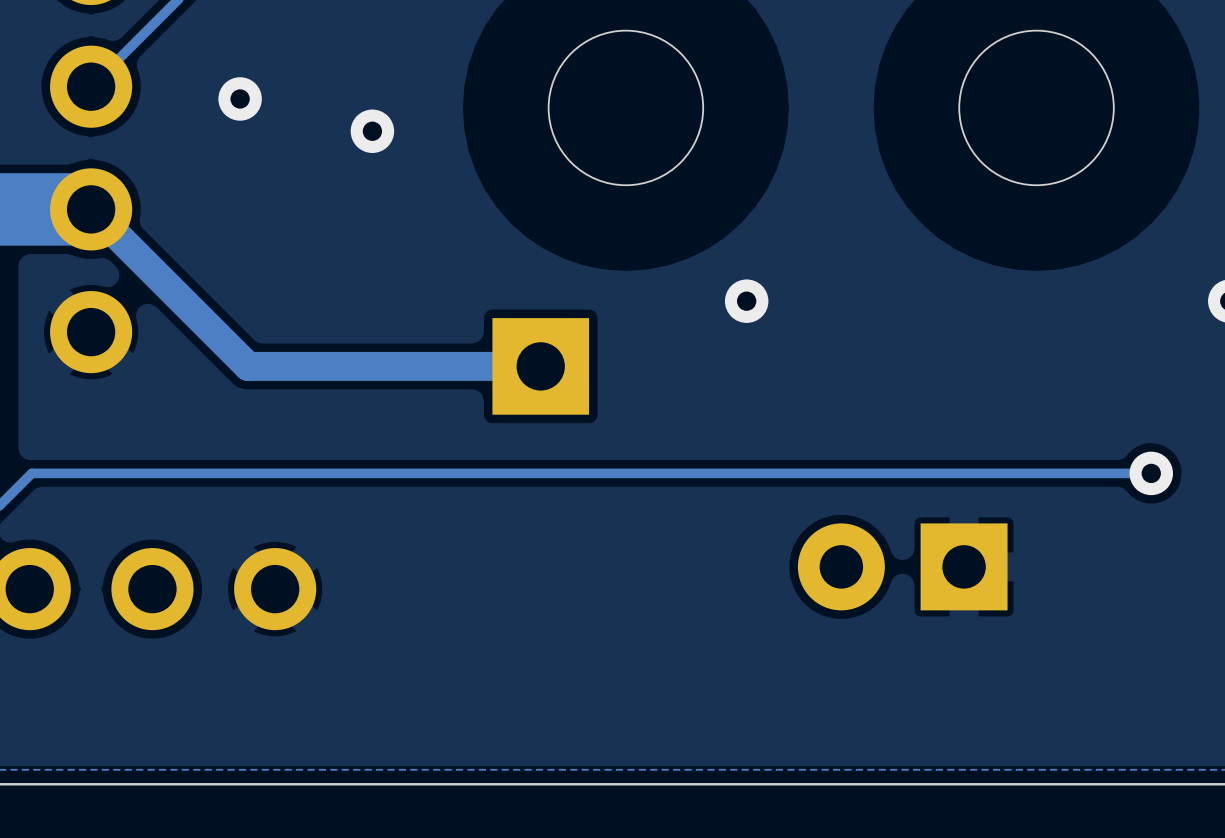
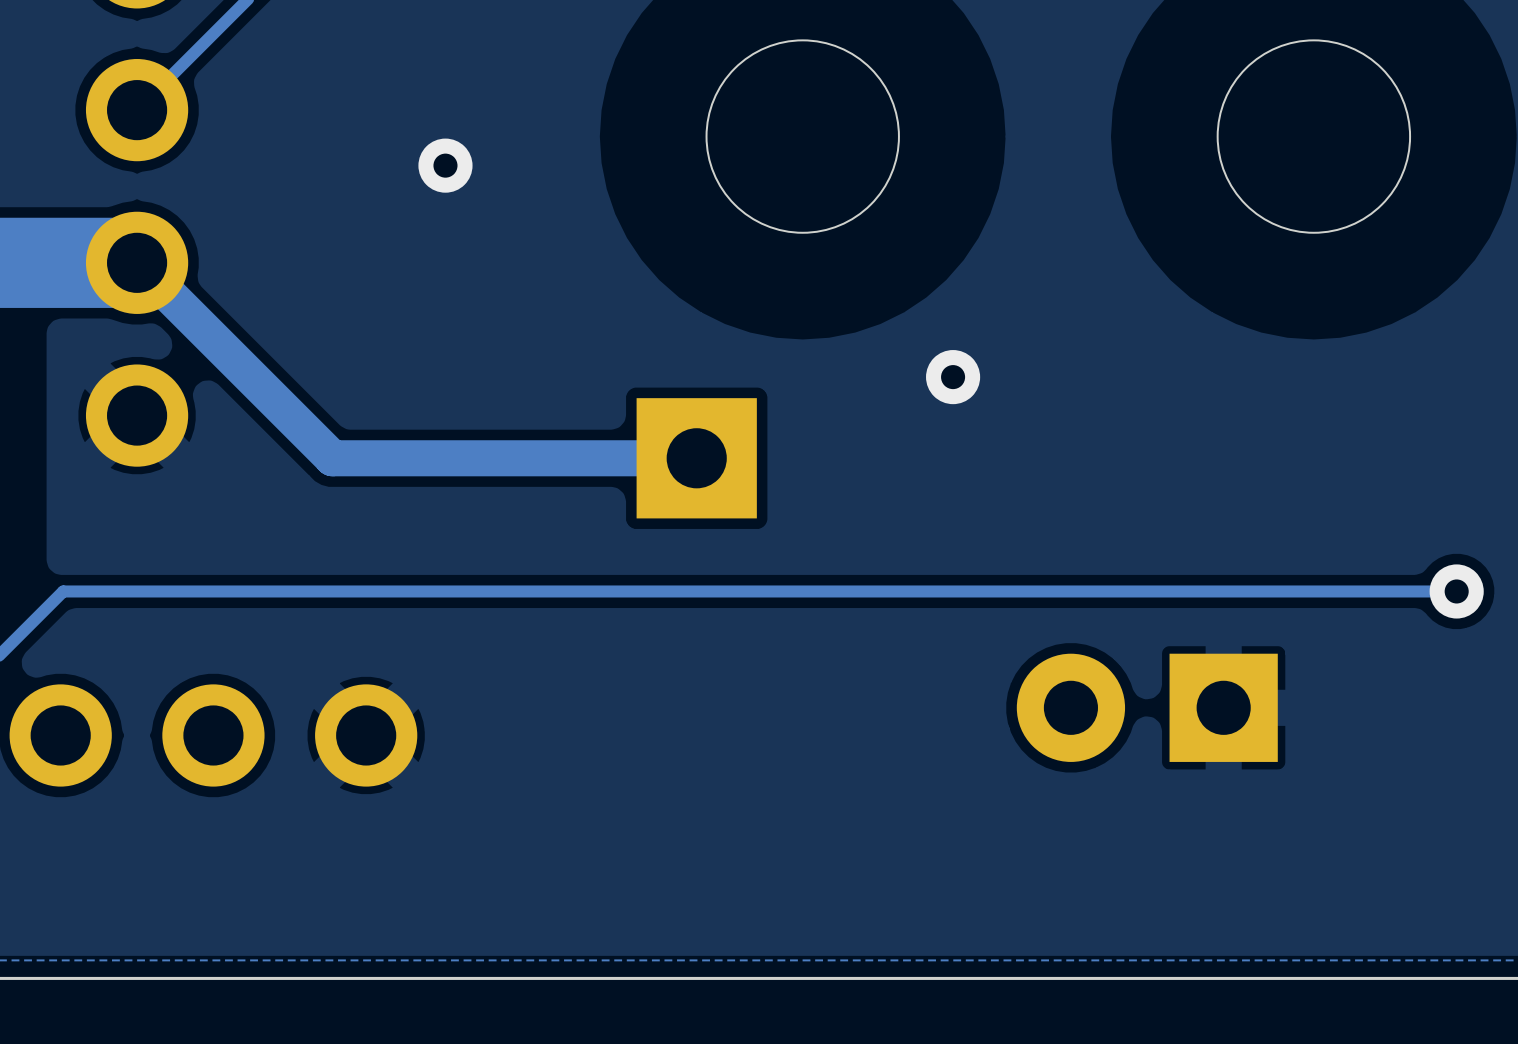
via: (240, 98) -> none
via position: (372, 131) -> (445, 165)

